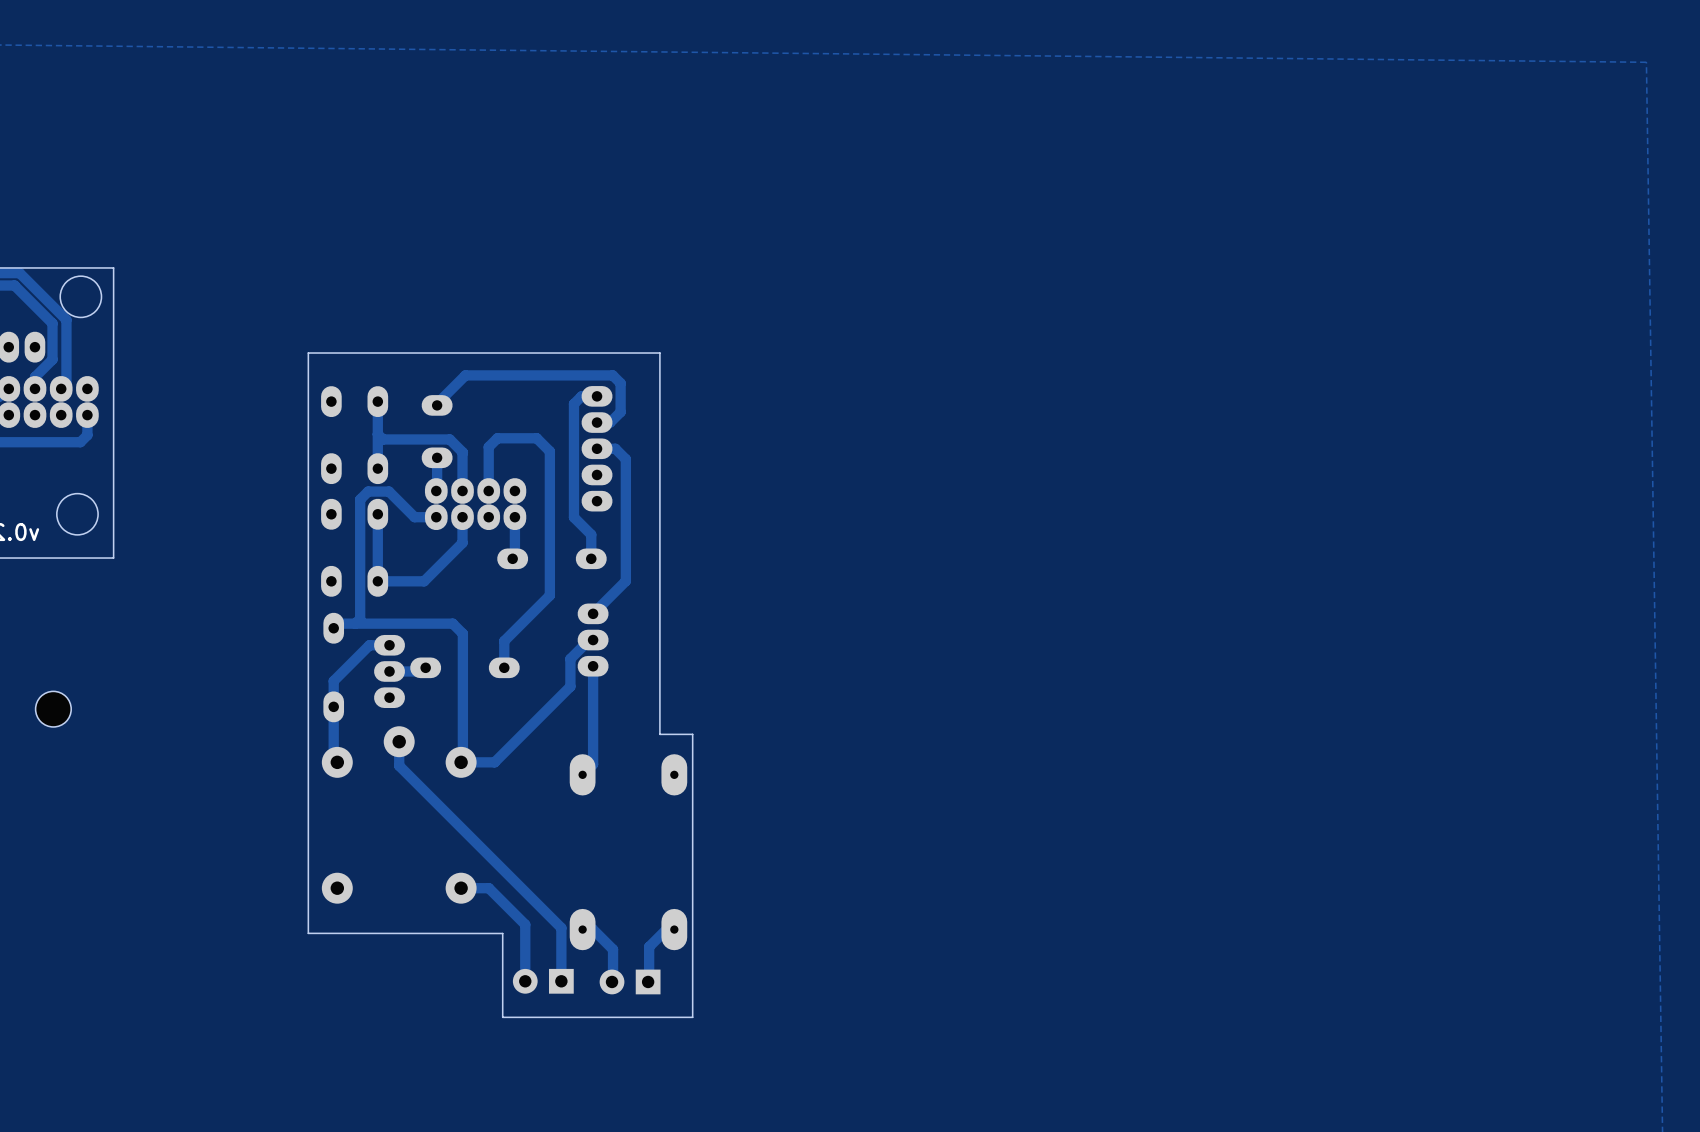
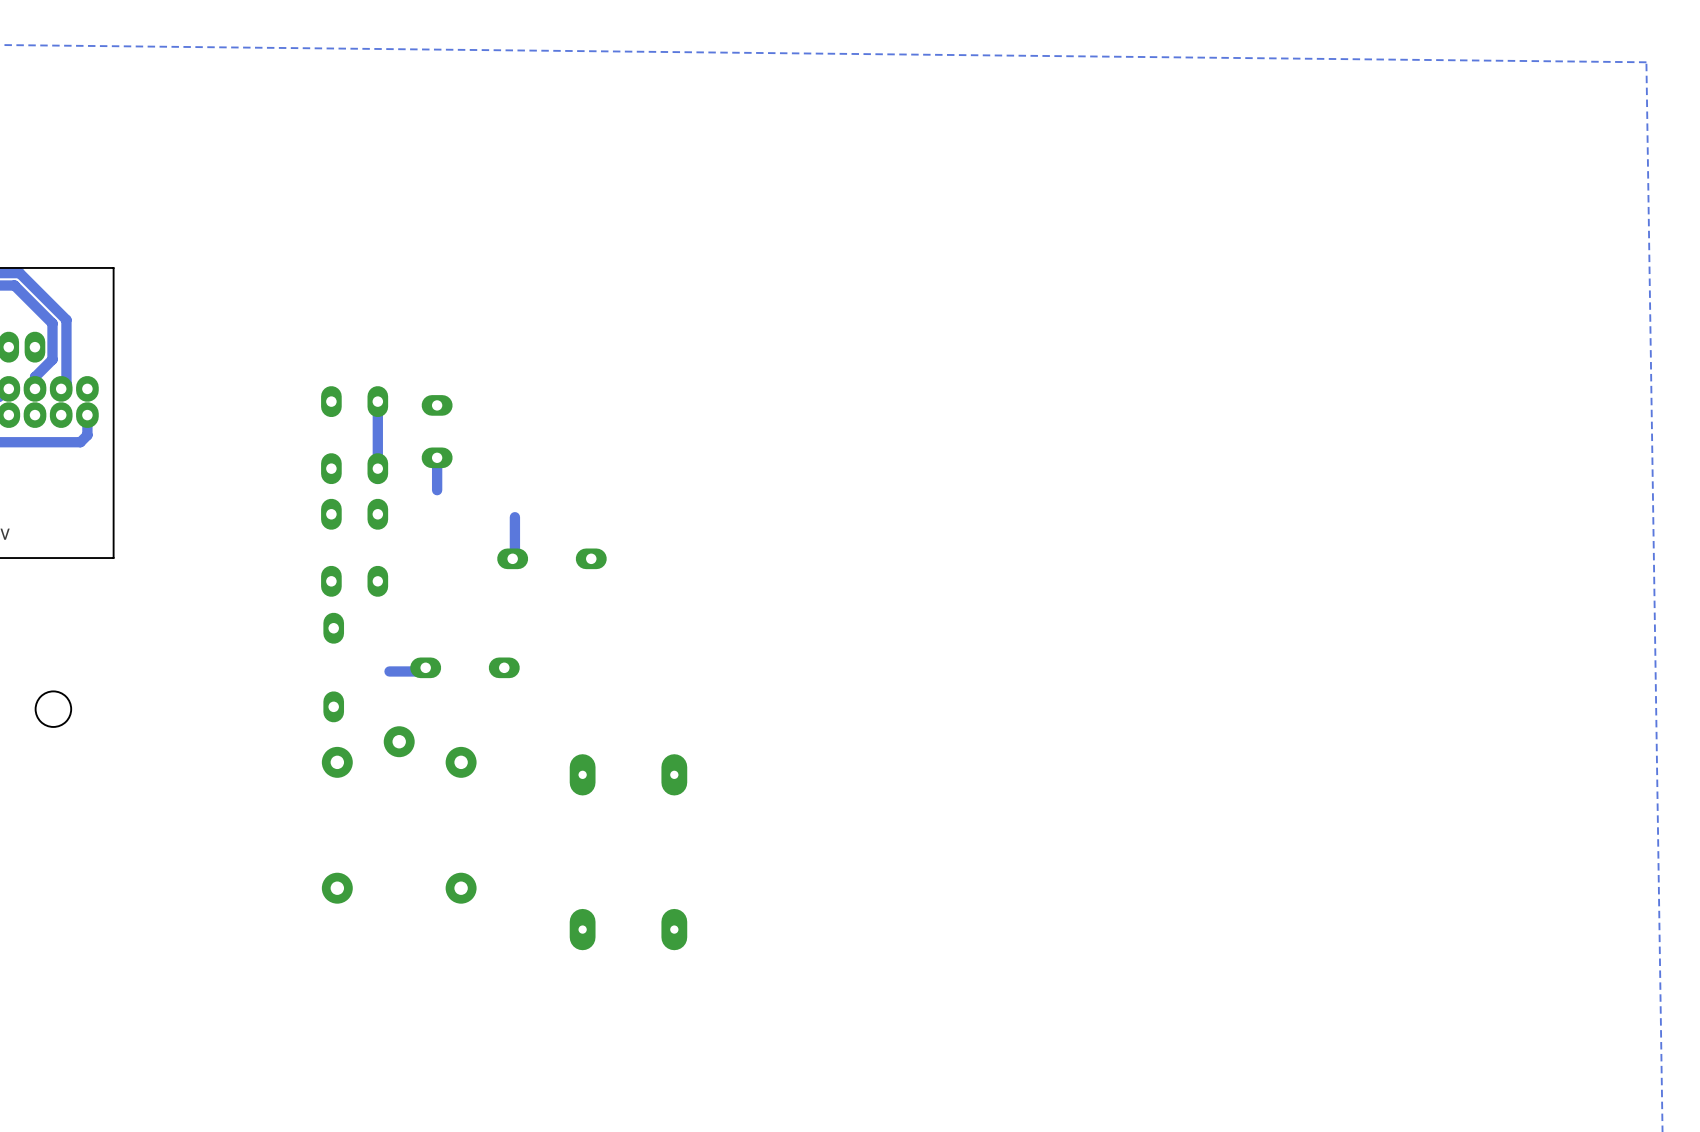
round board edge: [59, 275, 103, 318] -> none
board edge: (659, 353) (659, 734) (692, 734) (692, 1017) (502, 1017) (502, 933) (308, 933) (308, 353) (659, 353) -> none
track: (597, 396) (581, 396) (573, 403) (573, 517) (591, 534) (591, 558) -> none
track: (437, 403) (465, 375) (612, 375) (620, 383) (620, 412) (610, 422) (597, 422) -> none
track: (377, 434) (383, 439) (449, 439) (462, 452) (462, 491) -> none
track: (597, 448) (615, 448) (625, 459) (625, 581) (593, 613) -> none
part: (597, 448) -> none
track: (488, 491) (488, 447) (497, 438) (536, 438) (549, 451) (549, 595) (504, 641) (504, 667) -> none
round board edge: [56, 493, 99, 536] -> none
part: (475, 504) -> none
track: (377, 514) (377, 581) (424, 581) (462, 542) (462, 517) -> none
track: (436, 517) (414, 517) (389, 491) (368, 491) (360, 499) (360, 618) (355, 623) -> none
track: (333, 628) (338, 623) (452, 623) (462, 633) (462, 760) (461, 762) (494, 762) (570, 686) (570, 658) (589, 640) (593, 640) -> none
part: (593, 640) -> none
track: (389, 645) (369, 645) (333, 681) (333, 758) (337, 762) -> none
track: (593, 666) (593, 764) (582, 774) -> none
part: (389, 671) -> none
track: (399, 741) (399, 765) (561, 927) (561, 981) -> none
track: (461, 888) (488, 888) (525, 924) (525, 981) -> none
track: (584, 928) (592, 928) (613, 949) (613, 982) -> none
track: (675, 928) (667, 928) (649, 946) (649, 982) -> none
part: (543, 981) -> none
part: (630, 981) -> none

